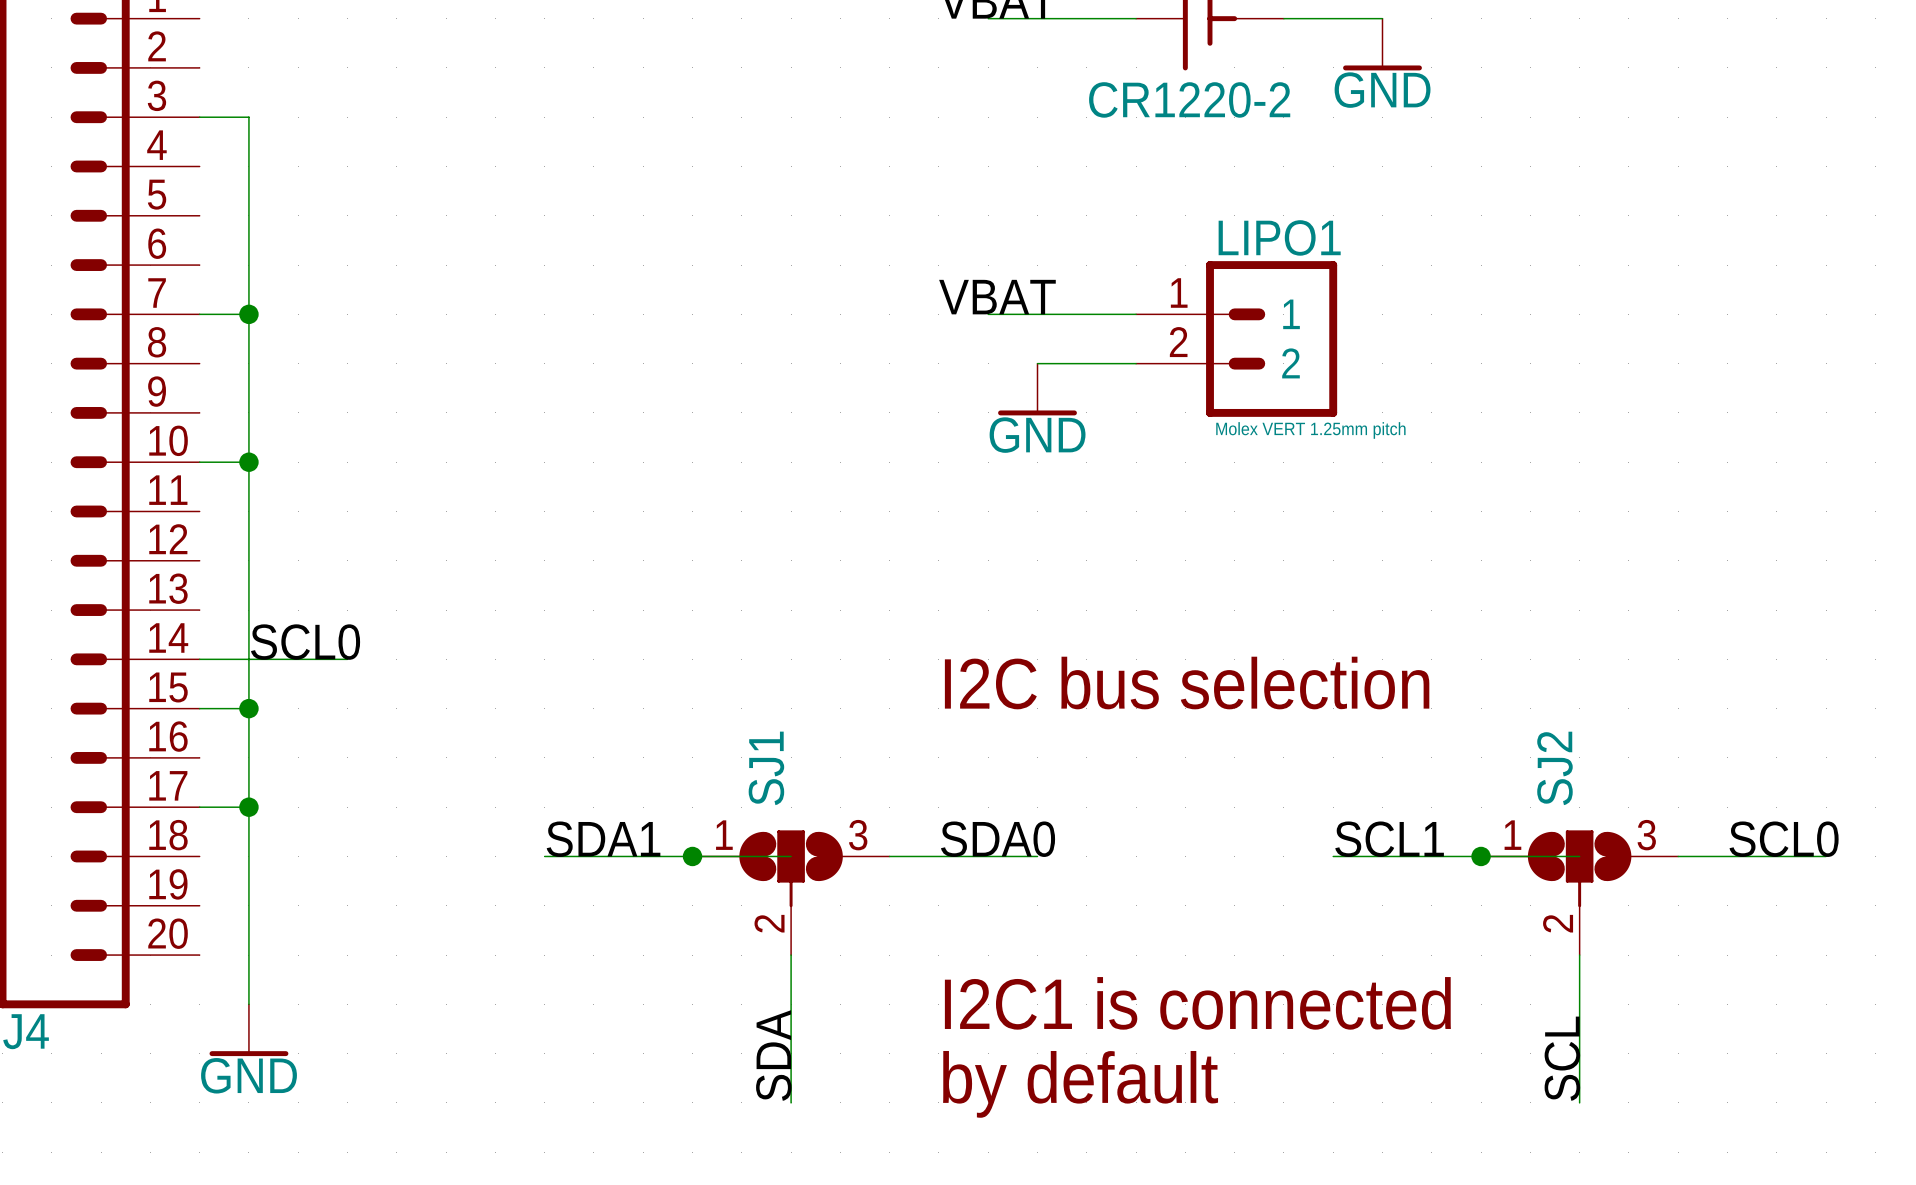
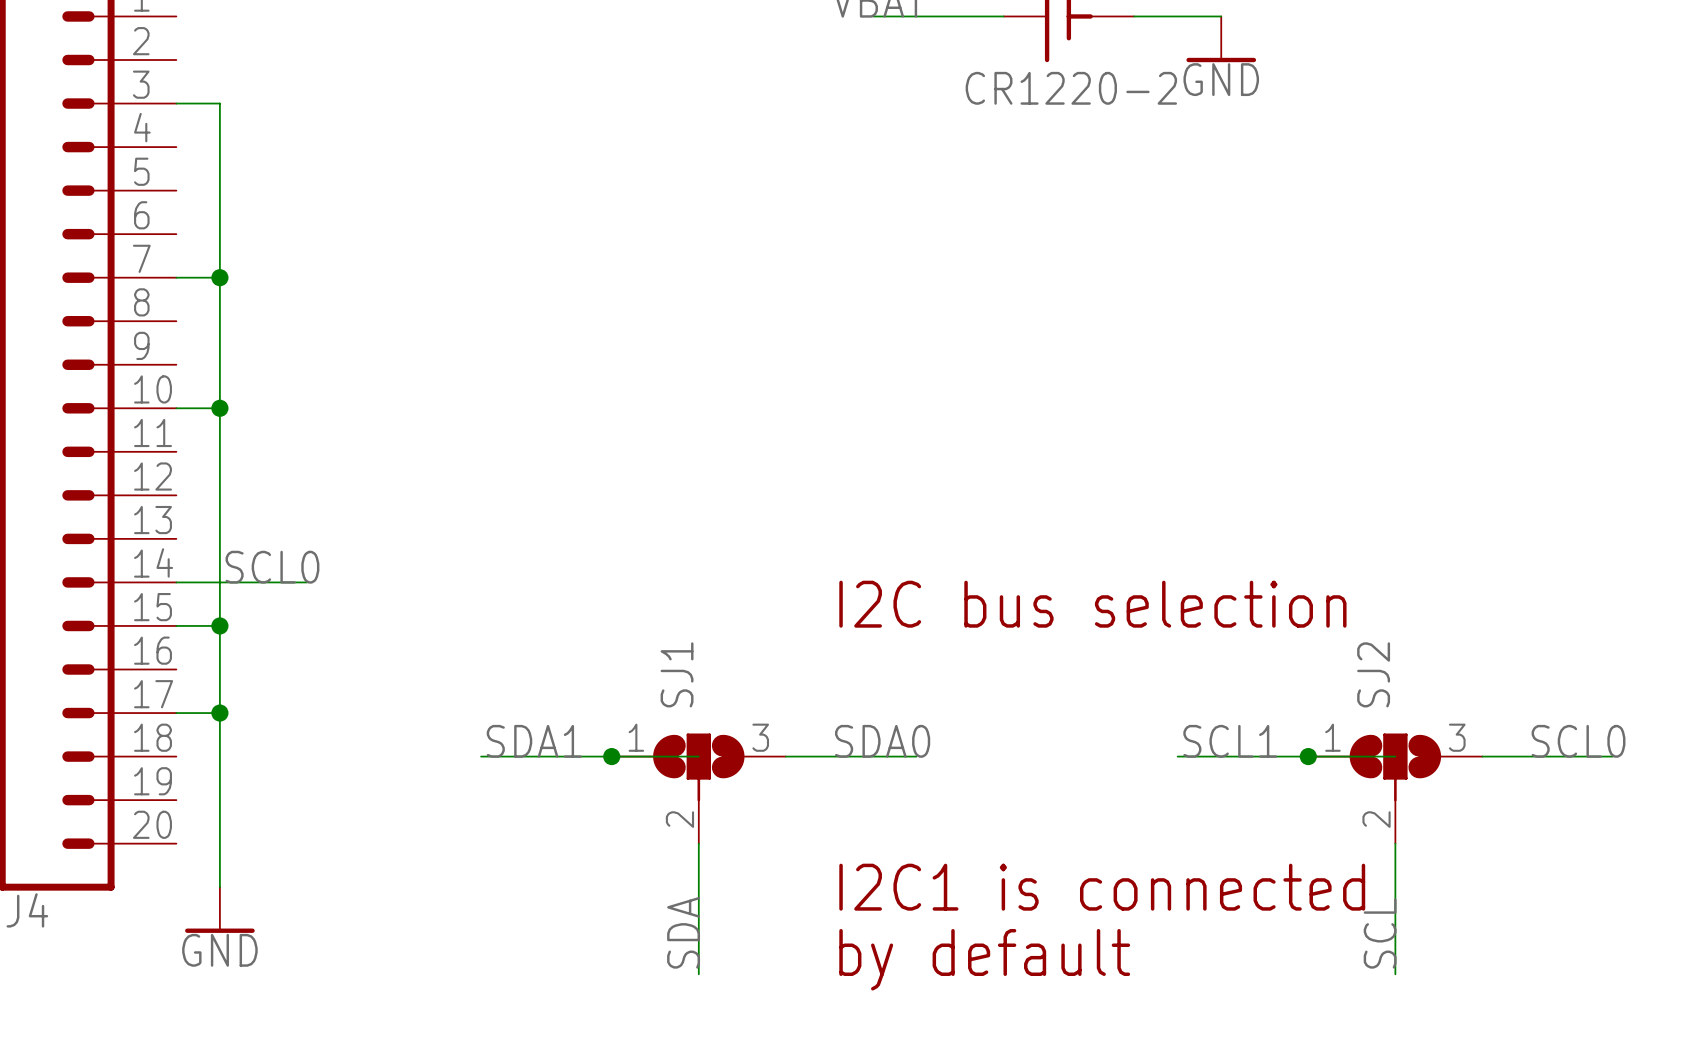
label: VBAT (997, 297) -> none
wire: (988, 314) (1136, 314) -> none
LIPO1: Molex VERT 1.25mm pitch (1236, 338) -> none
wire: (1037, 363) (1136, 363) -> none
power symbol: GND (1037, 389) -> none

